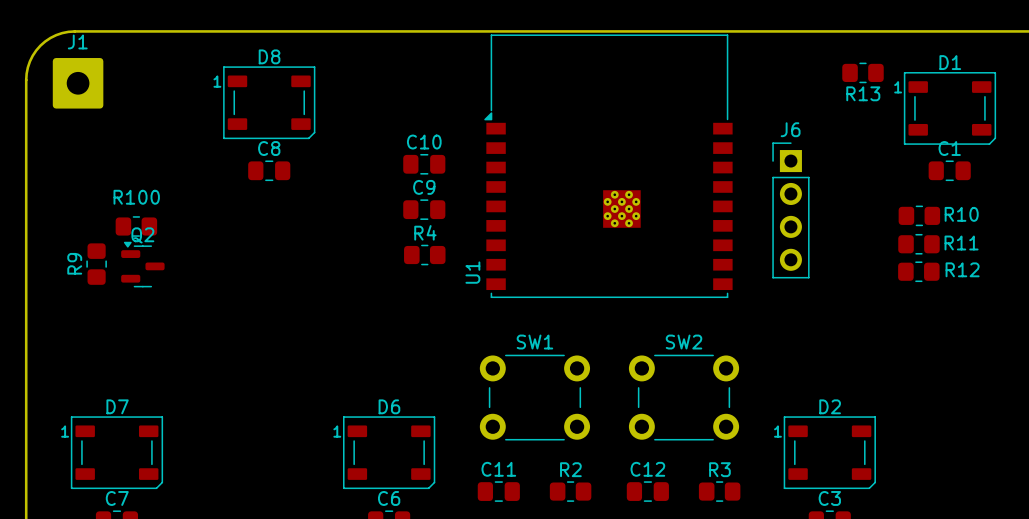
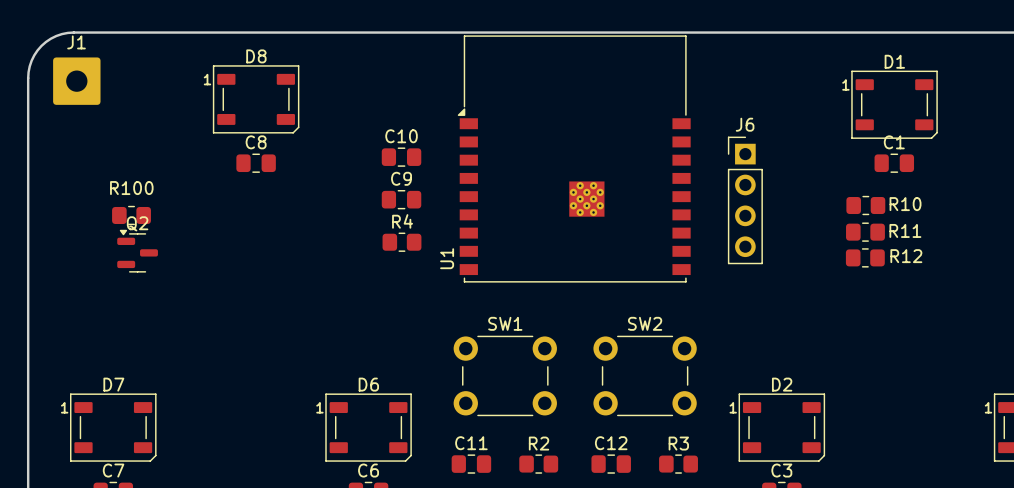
R13: (862, 72) -> none
R9: (96, 264) -> none

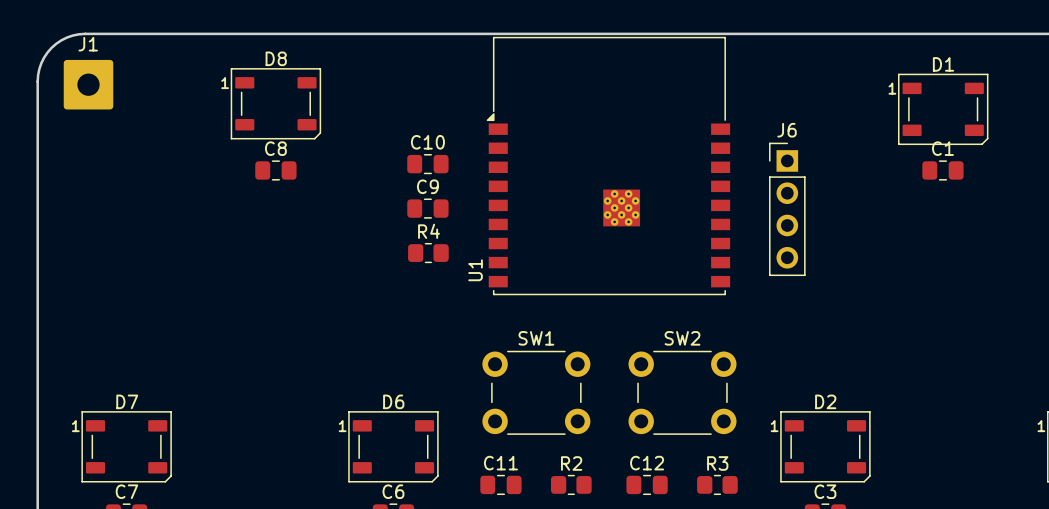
R10: (865, 205) -> none
R100: (131, 215) -> none
R11: (865, 232) -> none
Q2: (137, 251) -> none
R12: (865, 257) -> none

